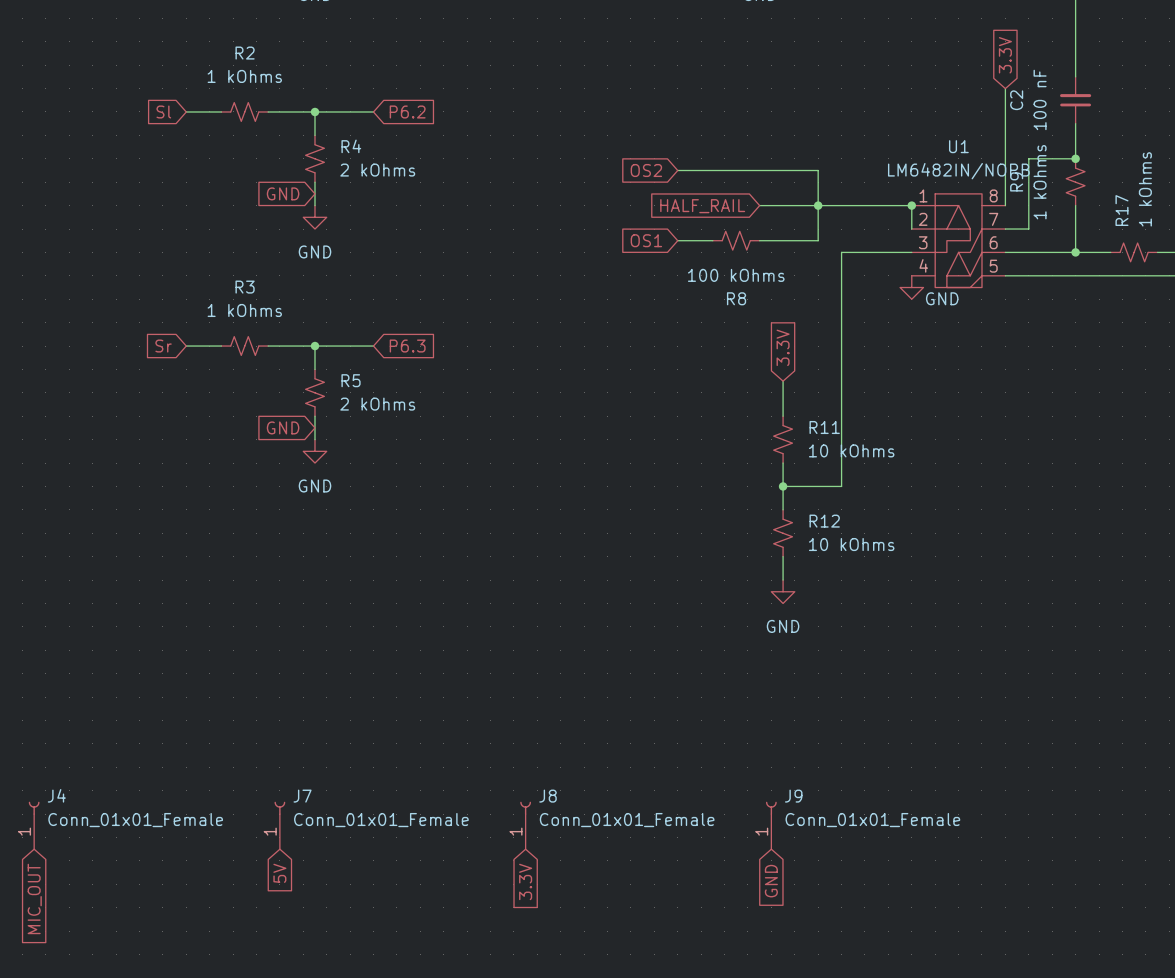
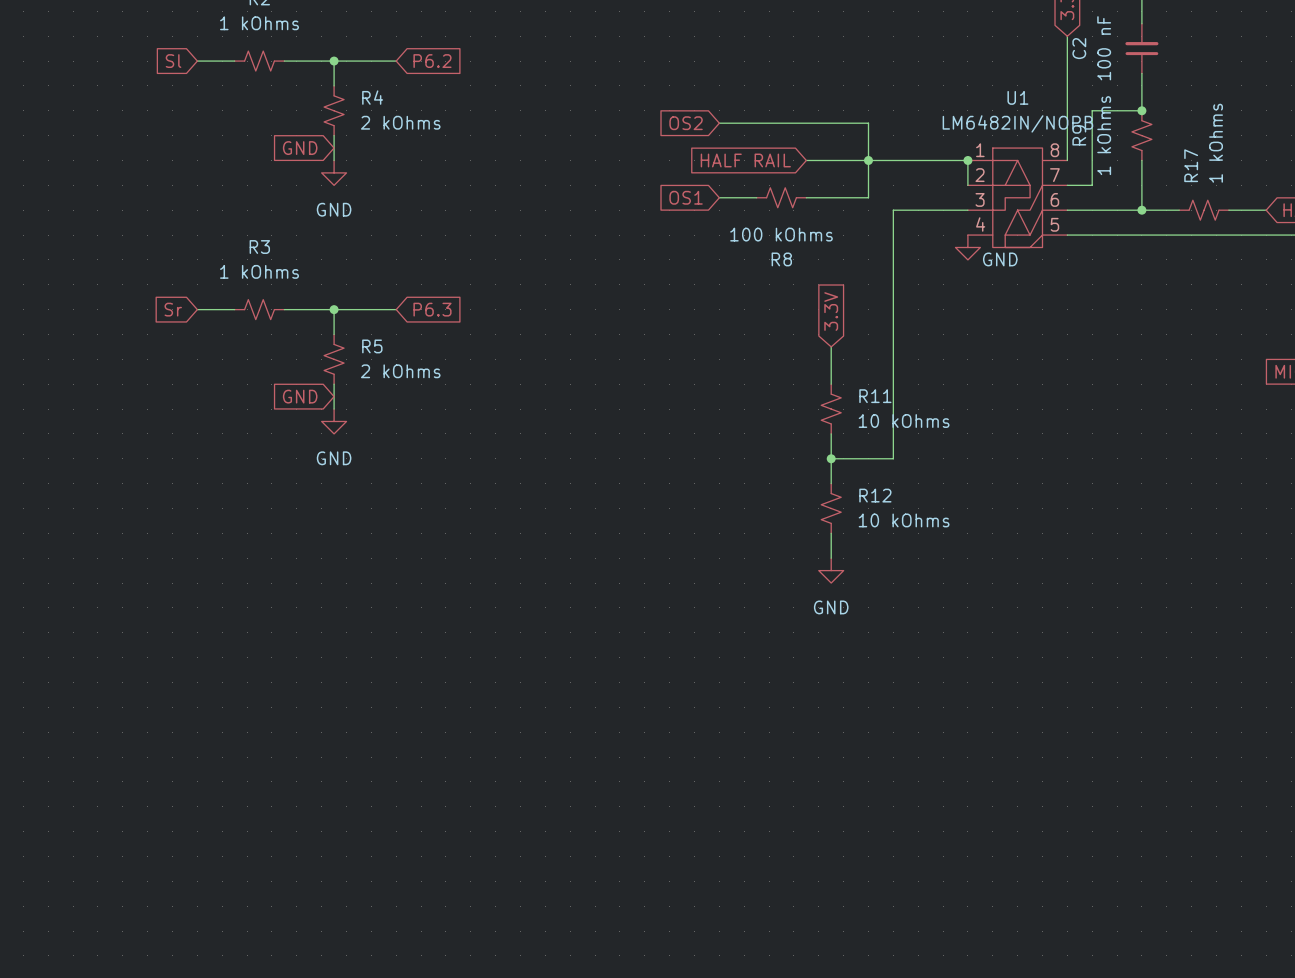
global label: HALF_RAIL (702, 206) -> HALF RAIL (745, 160)
J4: Conn_01x01_Female (34, 825) -> none
J7: Conn_01x01_Female (279, 825) -> none
J8: Conn_01x01_Female (525, 825) -> none
J9: Conn_01x01_Female (771, 825) -> none
global label: 5V (279, 873) -> none
global label: 3.3V (525, 881) -> none
global label: GND (771, 881) -> none
global label: MIC_OUT (34, 898) -> none

